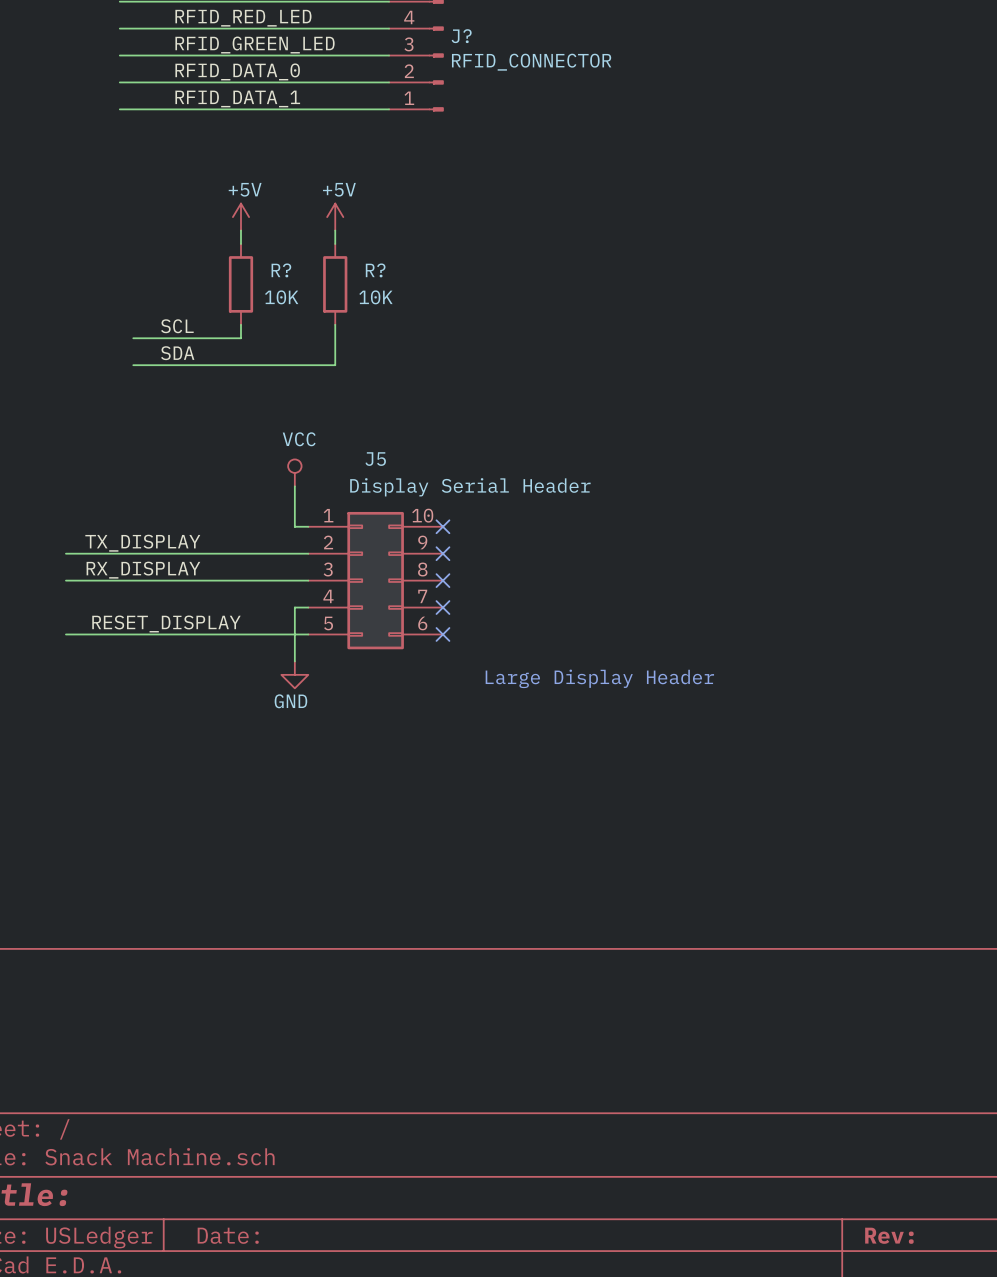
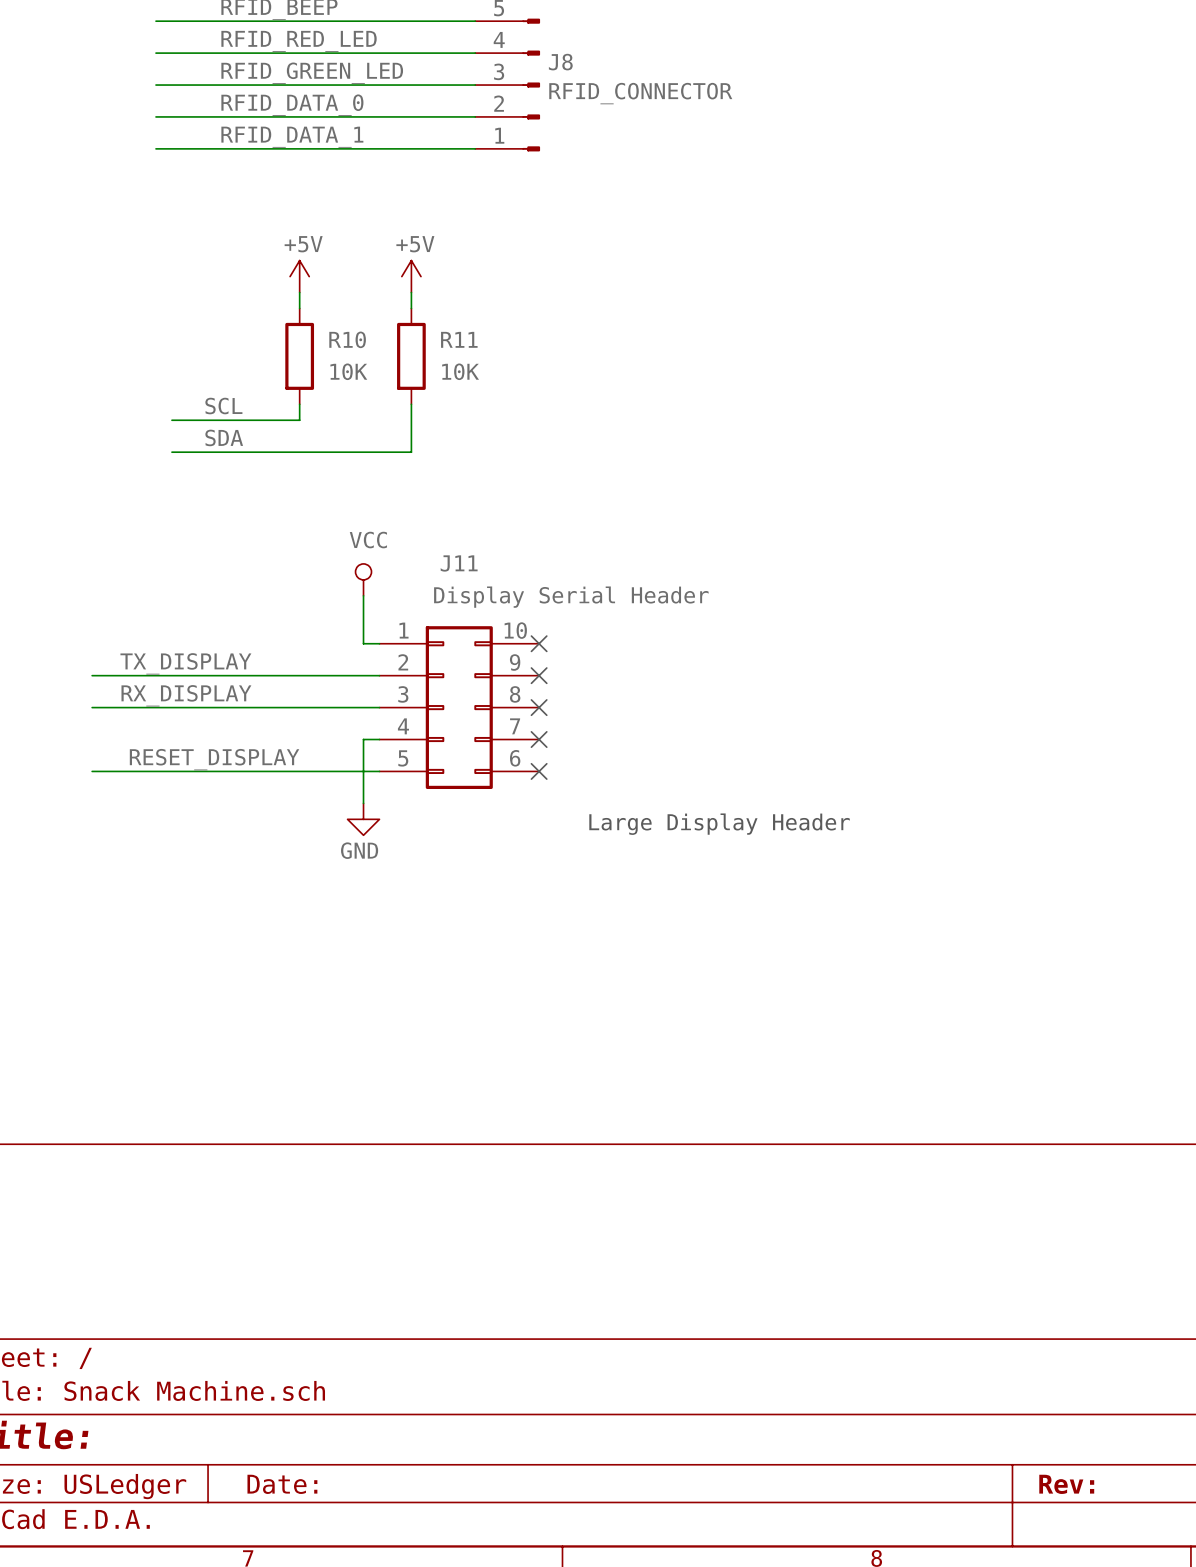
J? name: J? (461, 36) -> J8 (560, 62)
R? name: R? (281, 270) -> R10 (347, 339)
R? name: R? (375, 270) -> R11 (459, 339)
J5 name: J5 (375, 459) -> J11 (459, 563)

